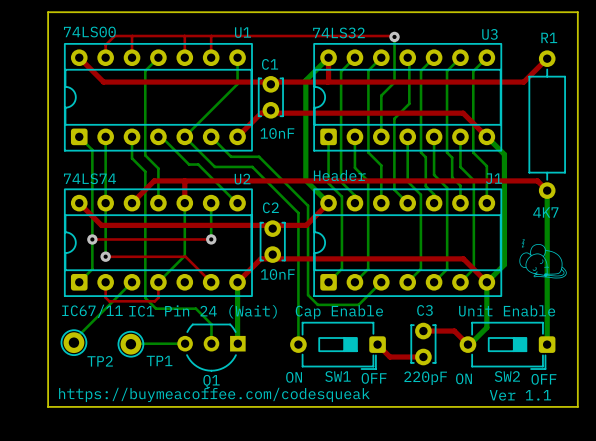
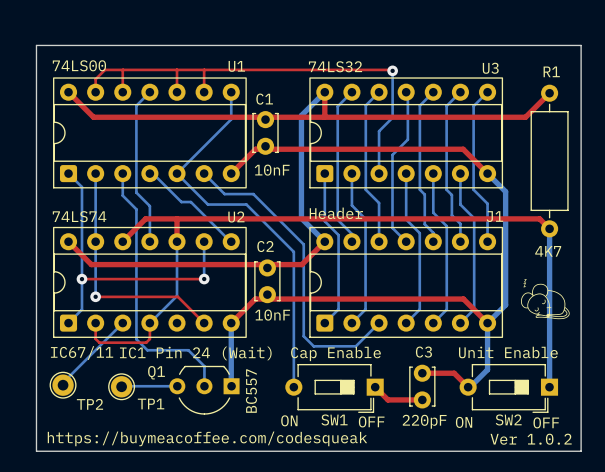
SW1 footprint: [290, 322, 386, 370] -> [285, 364, 384, 413]
SW2 footprint: [459, 322, 556, 370] -> [459, 364, 559, 413]
Q1 value: none -> BC557 (251, 391)
Q1 name position: Q1 (211, 381) -> Q1 (156, 372)
text: Ver 1.1 (520, 395) -> Ver 1.0.2 (531, 439)

